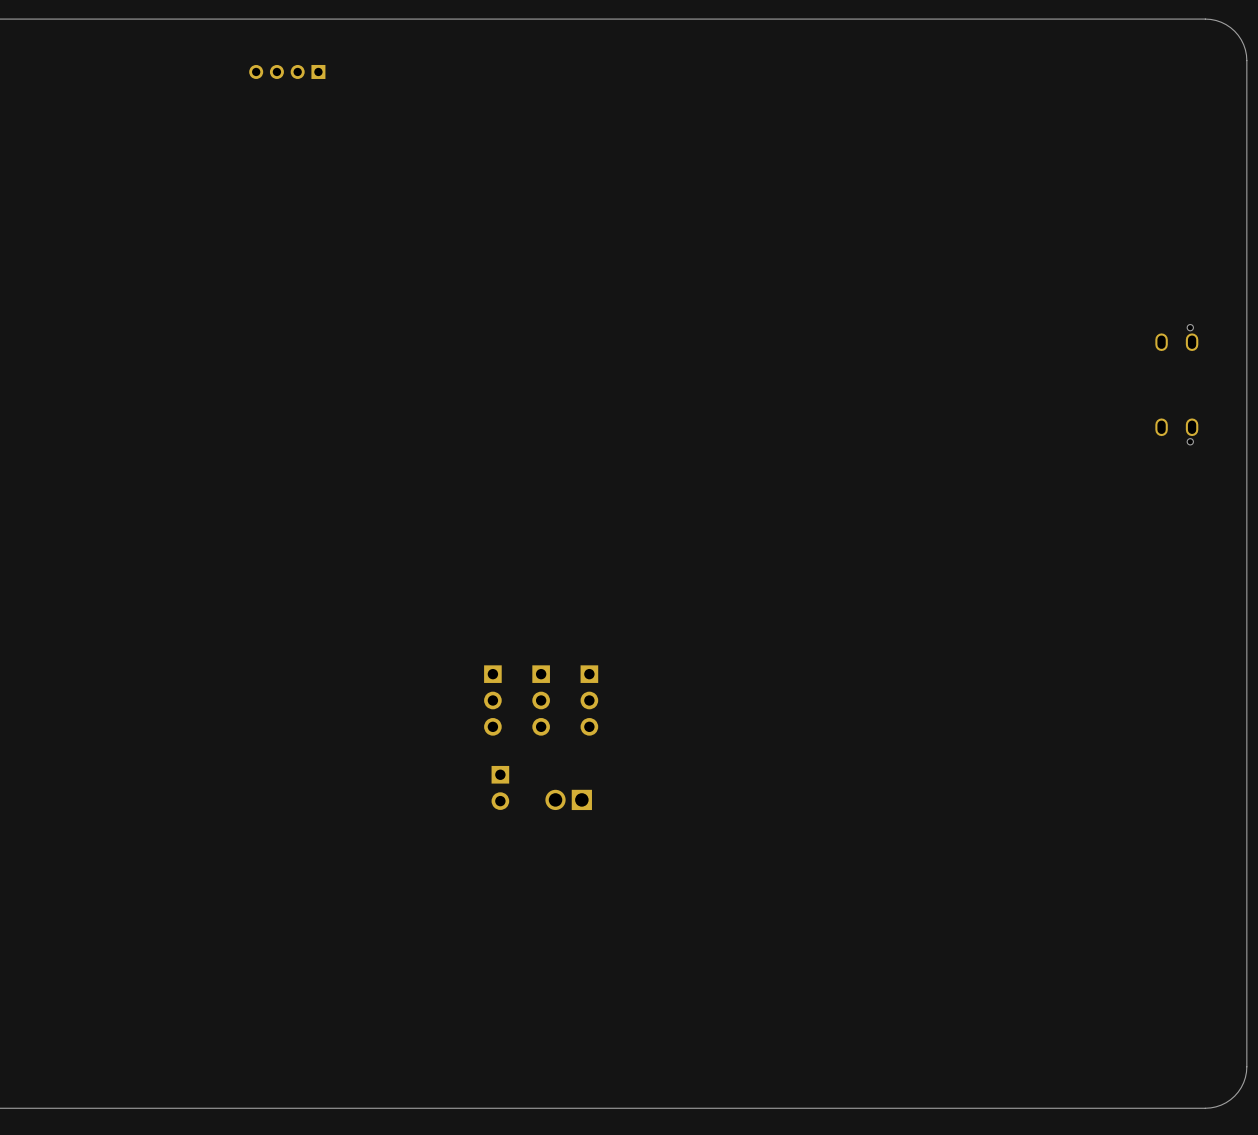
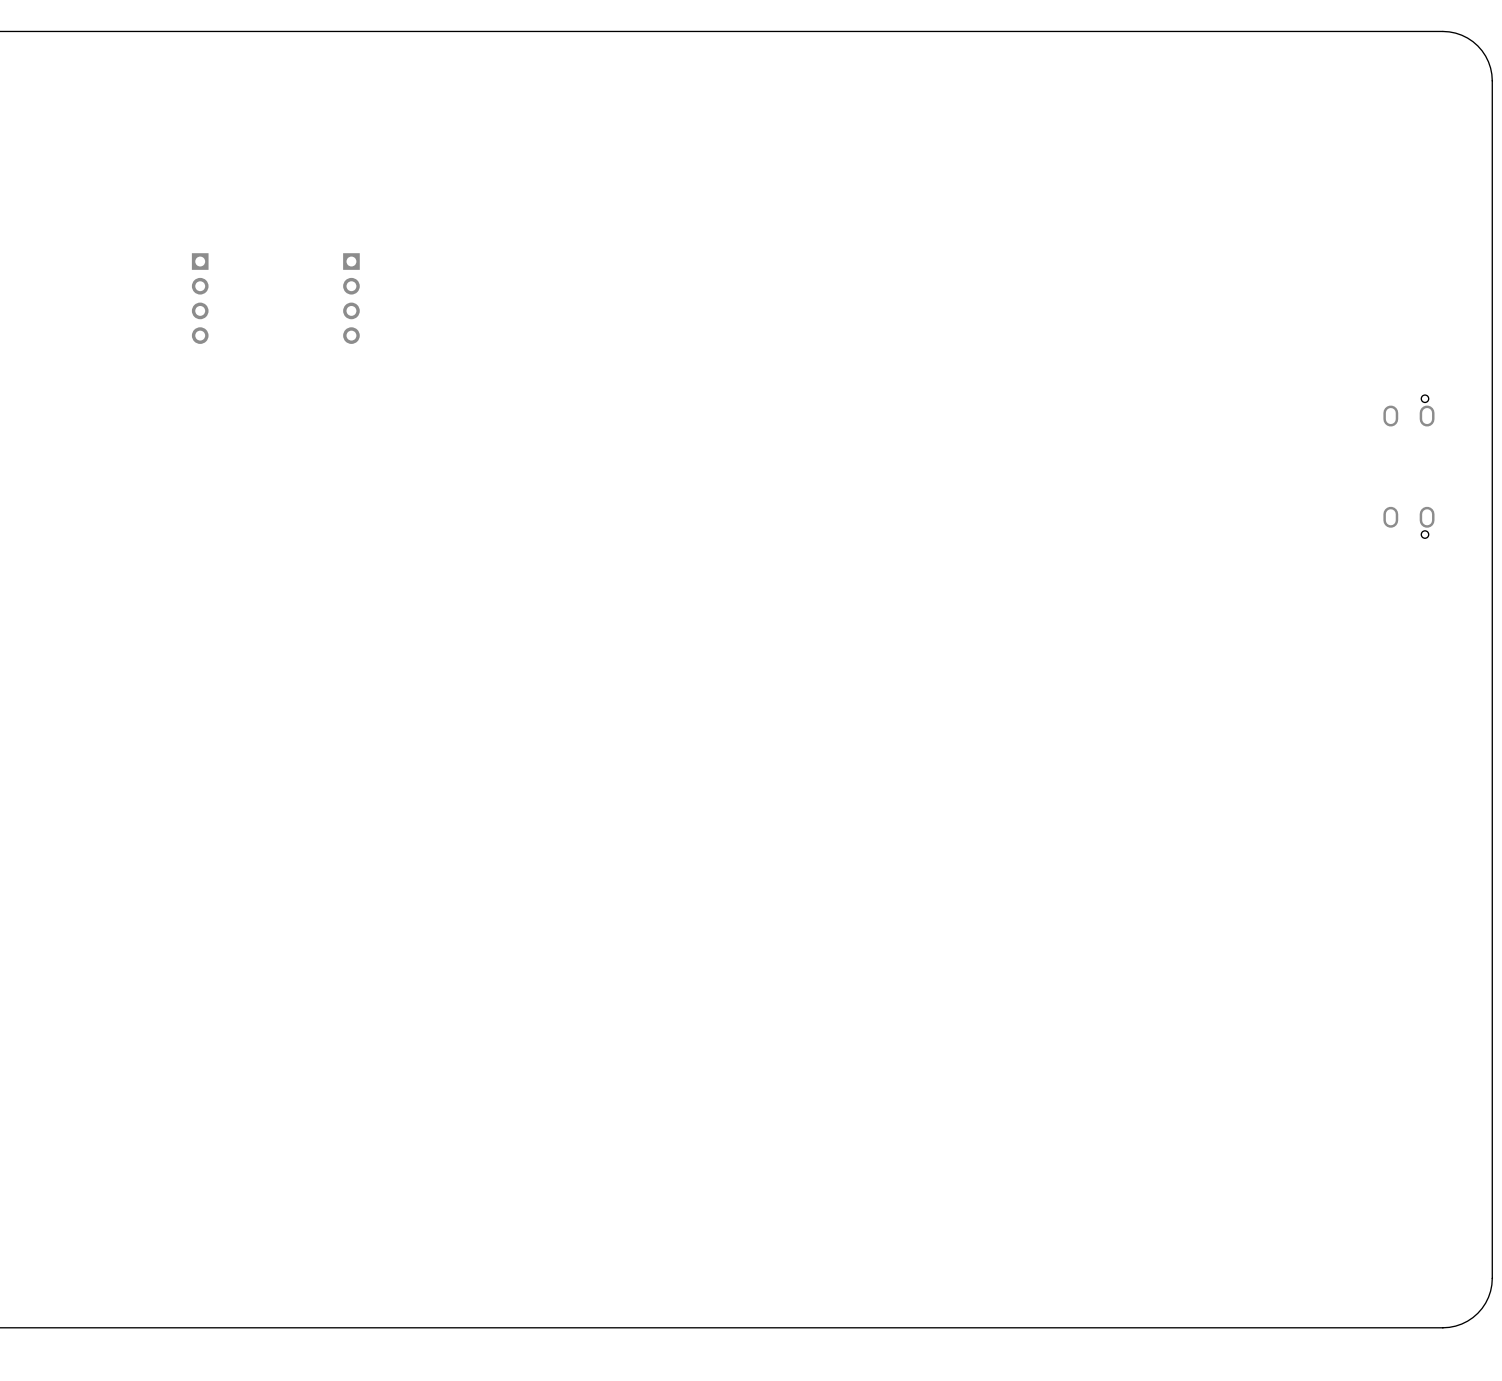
part: (287, 71) -> none
part: none -> (200, 298)
part: none -> (351, 298)
part: (492, 700) -> none
part: (541, 700) -> none
part: (589, 700) -> none
part: (500, 787) -> none
part: (568, 799) -> none

